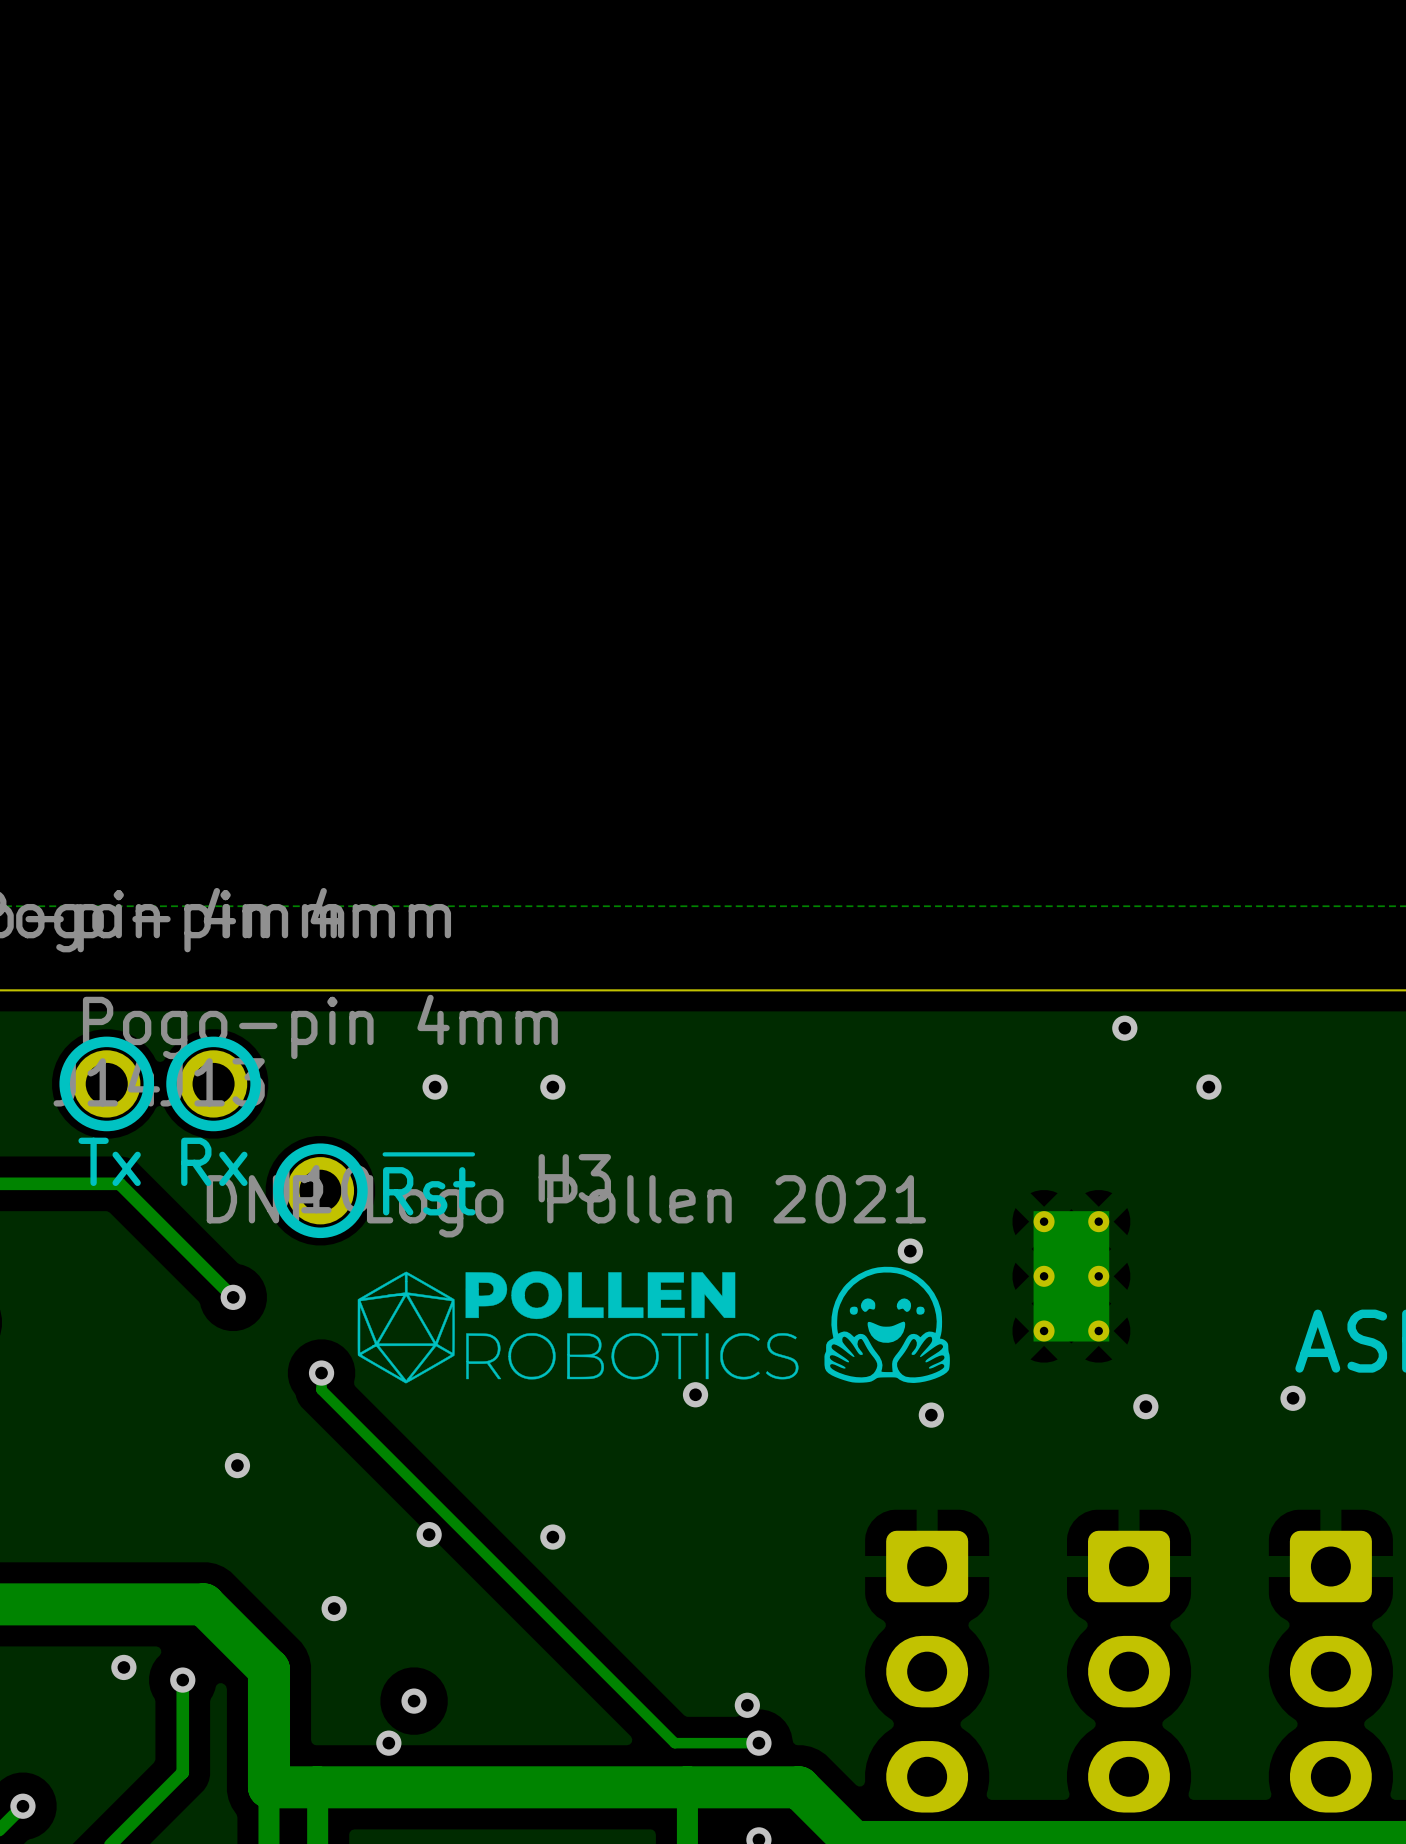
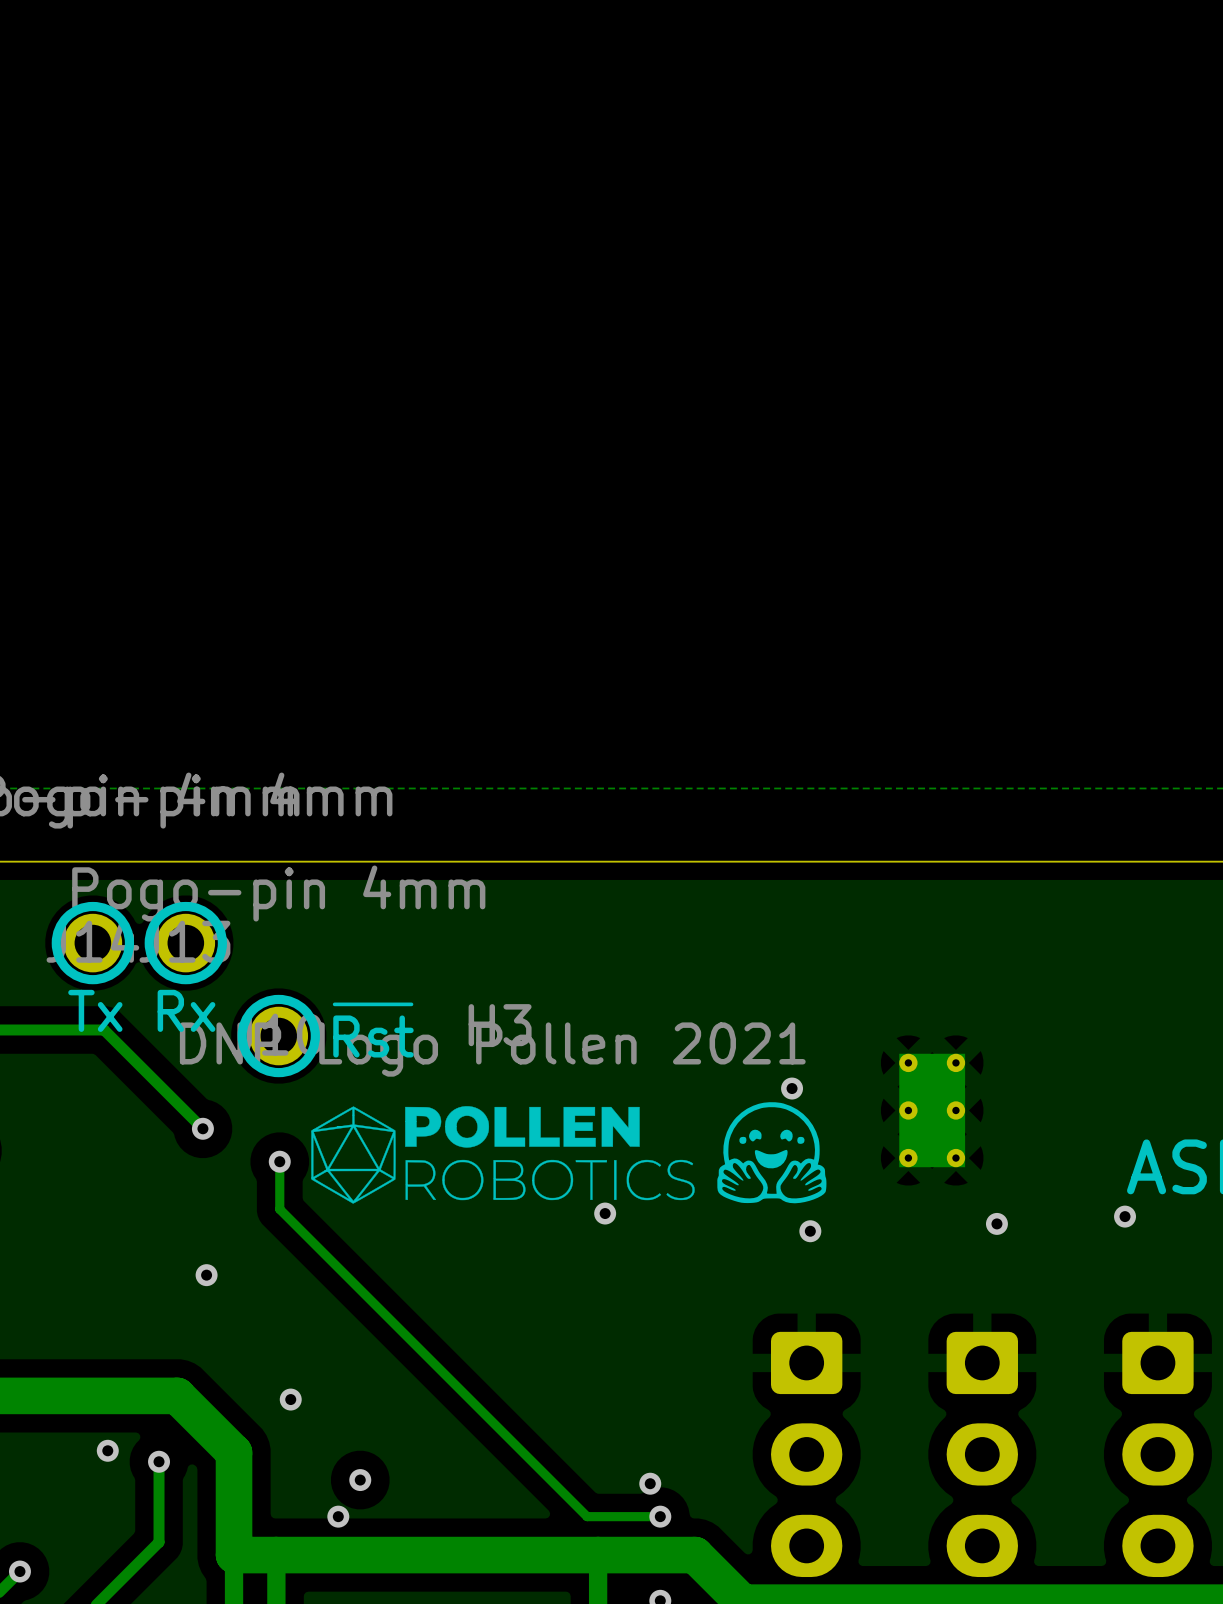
via: (1124, 1028) -> none
via: (435, 1087) -> none
via: (552, 1087) -> none
via: (1208, 1087) -> none
track: none -> (279, 1161) (279, 1194)
via position: (321, 1373) -> (279, 1161)
via: (429, 1534) -> none
via: (552, 1537) -> none

